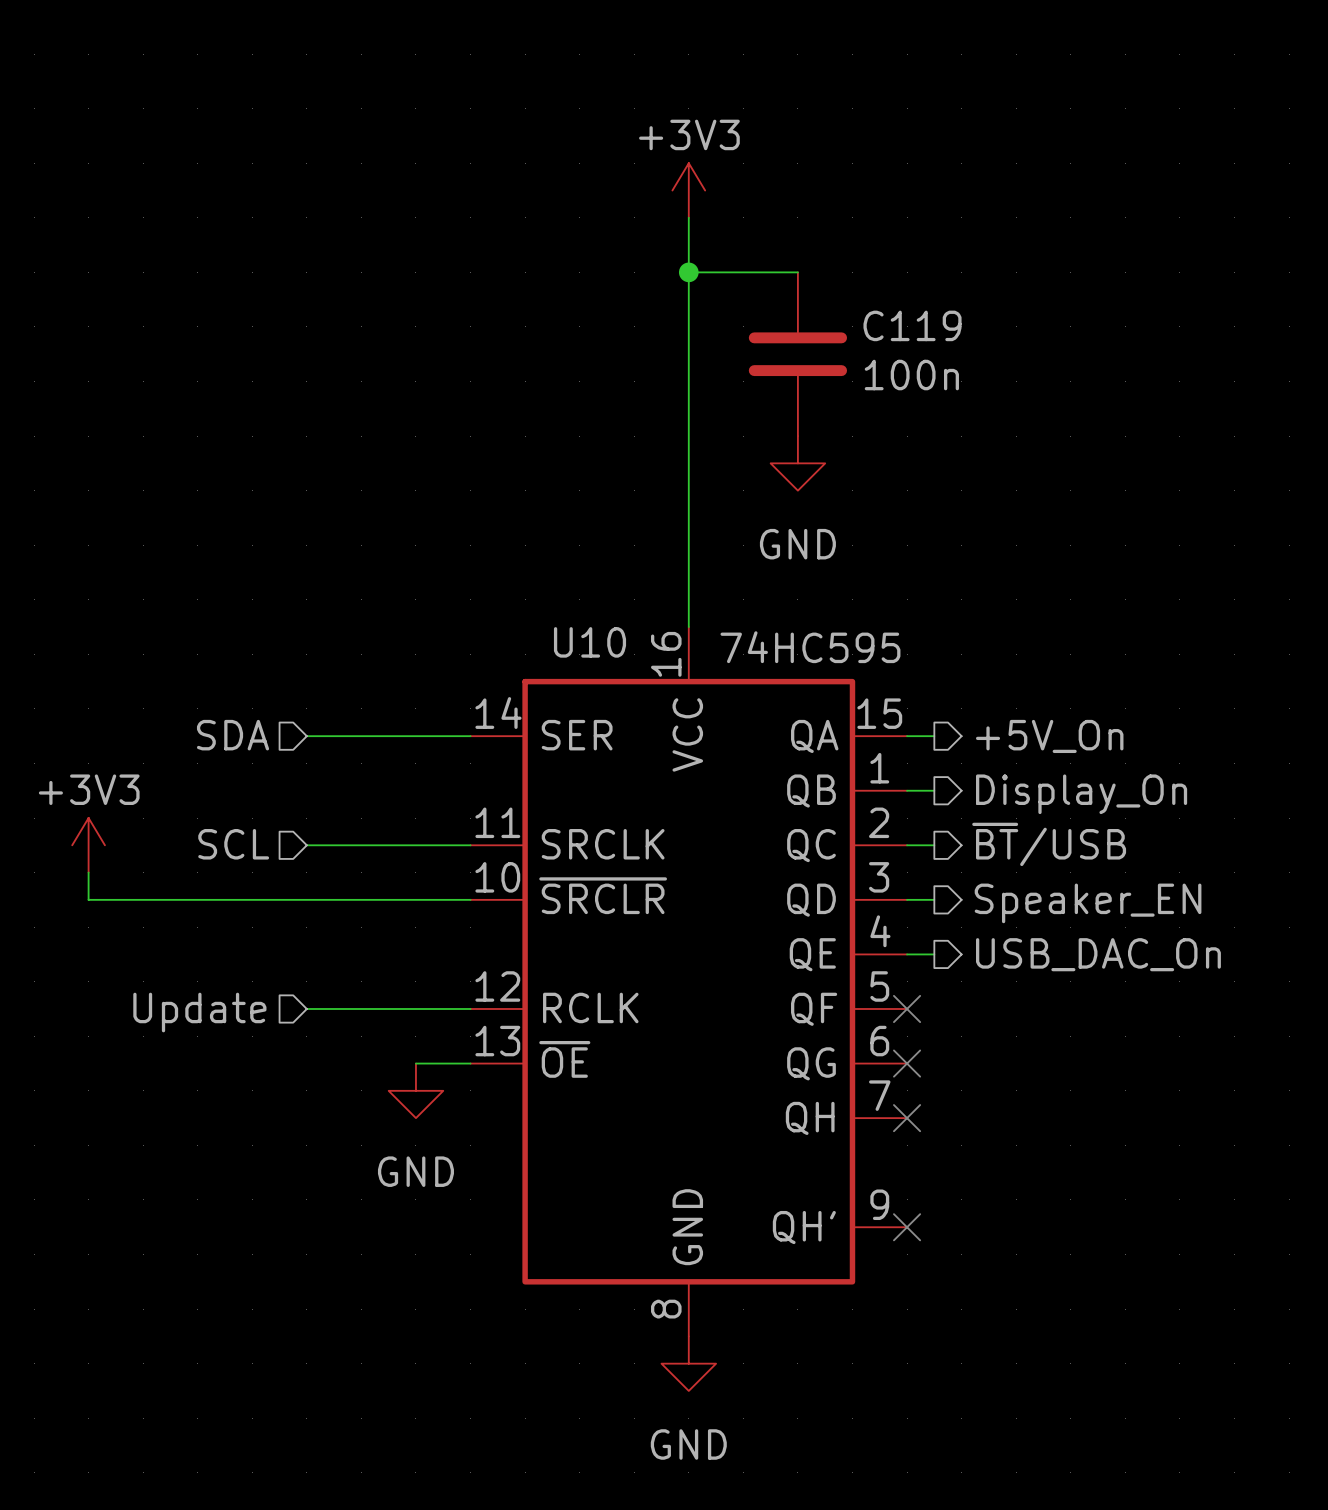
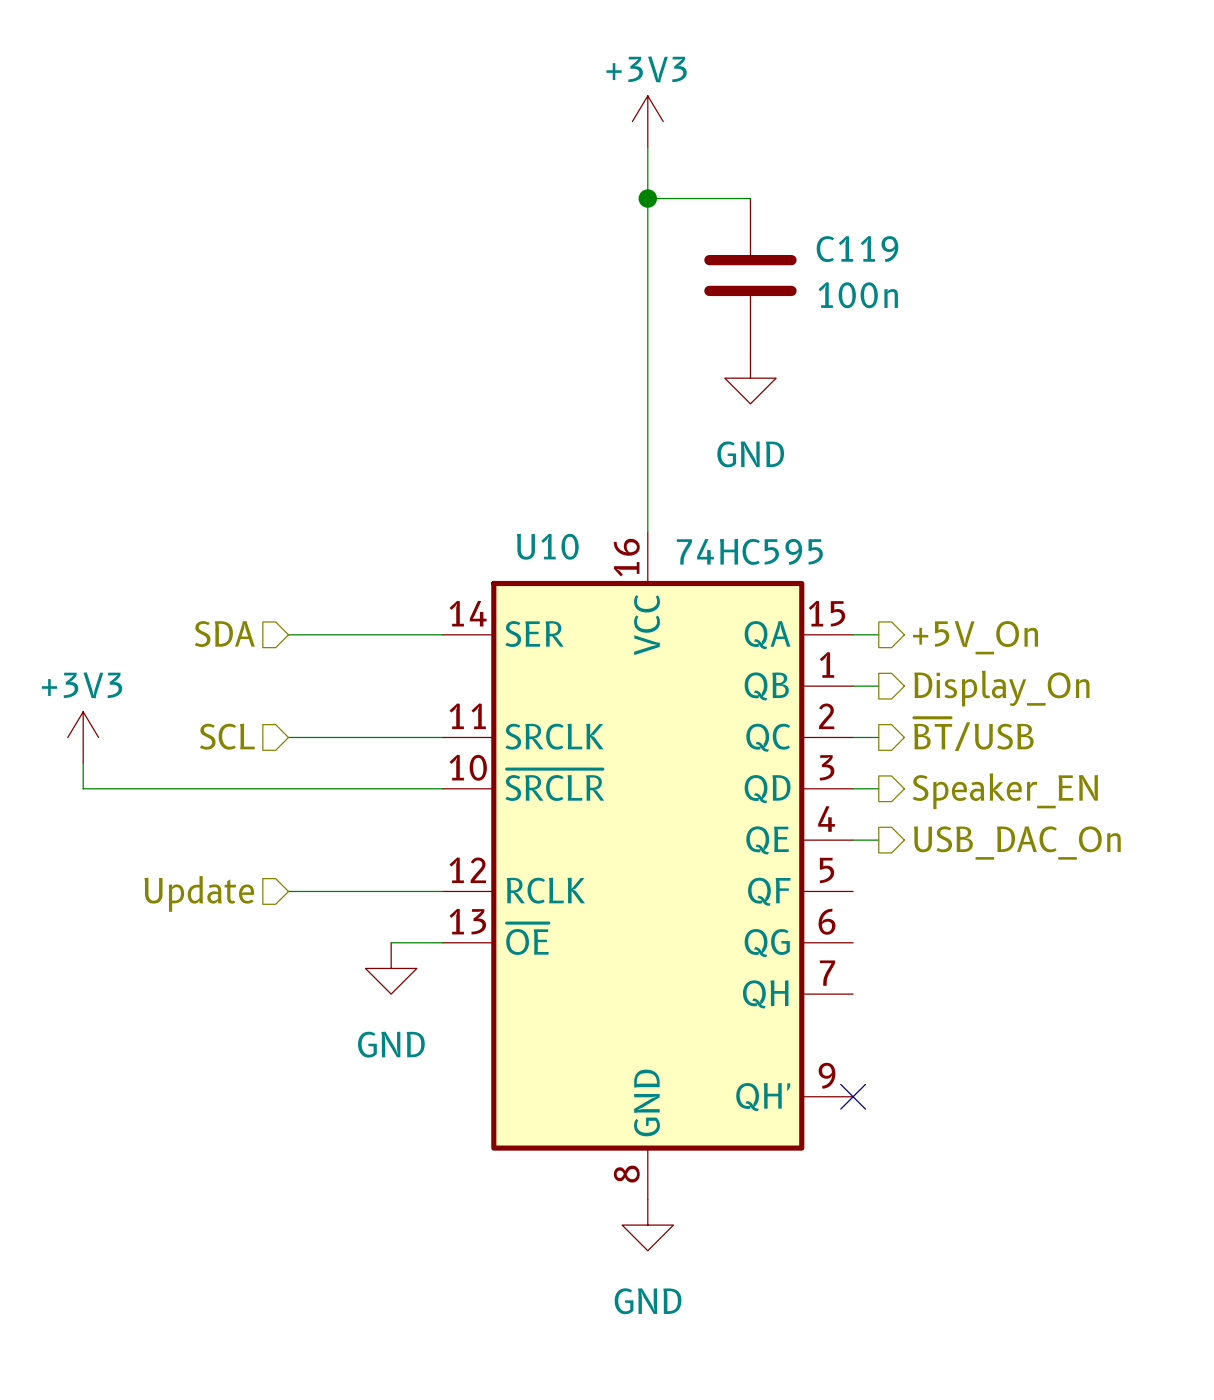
no-connect mark: (907, 1008) -> none
no-connect mark: (907, 1063) -> none
no-connect mark: (907, 1118) -> none

